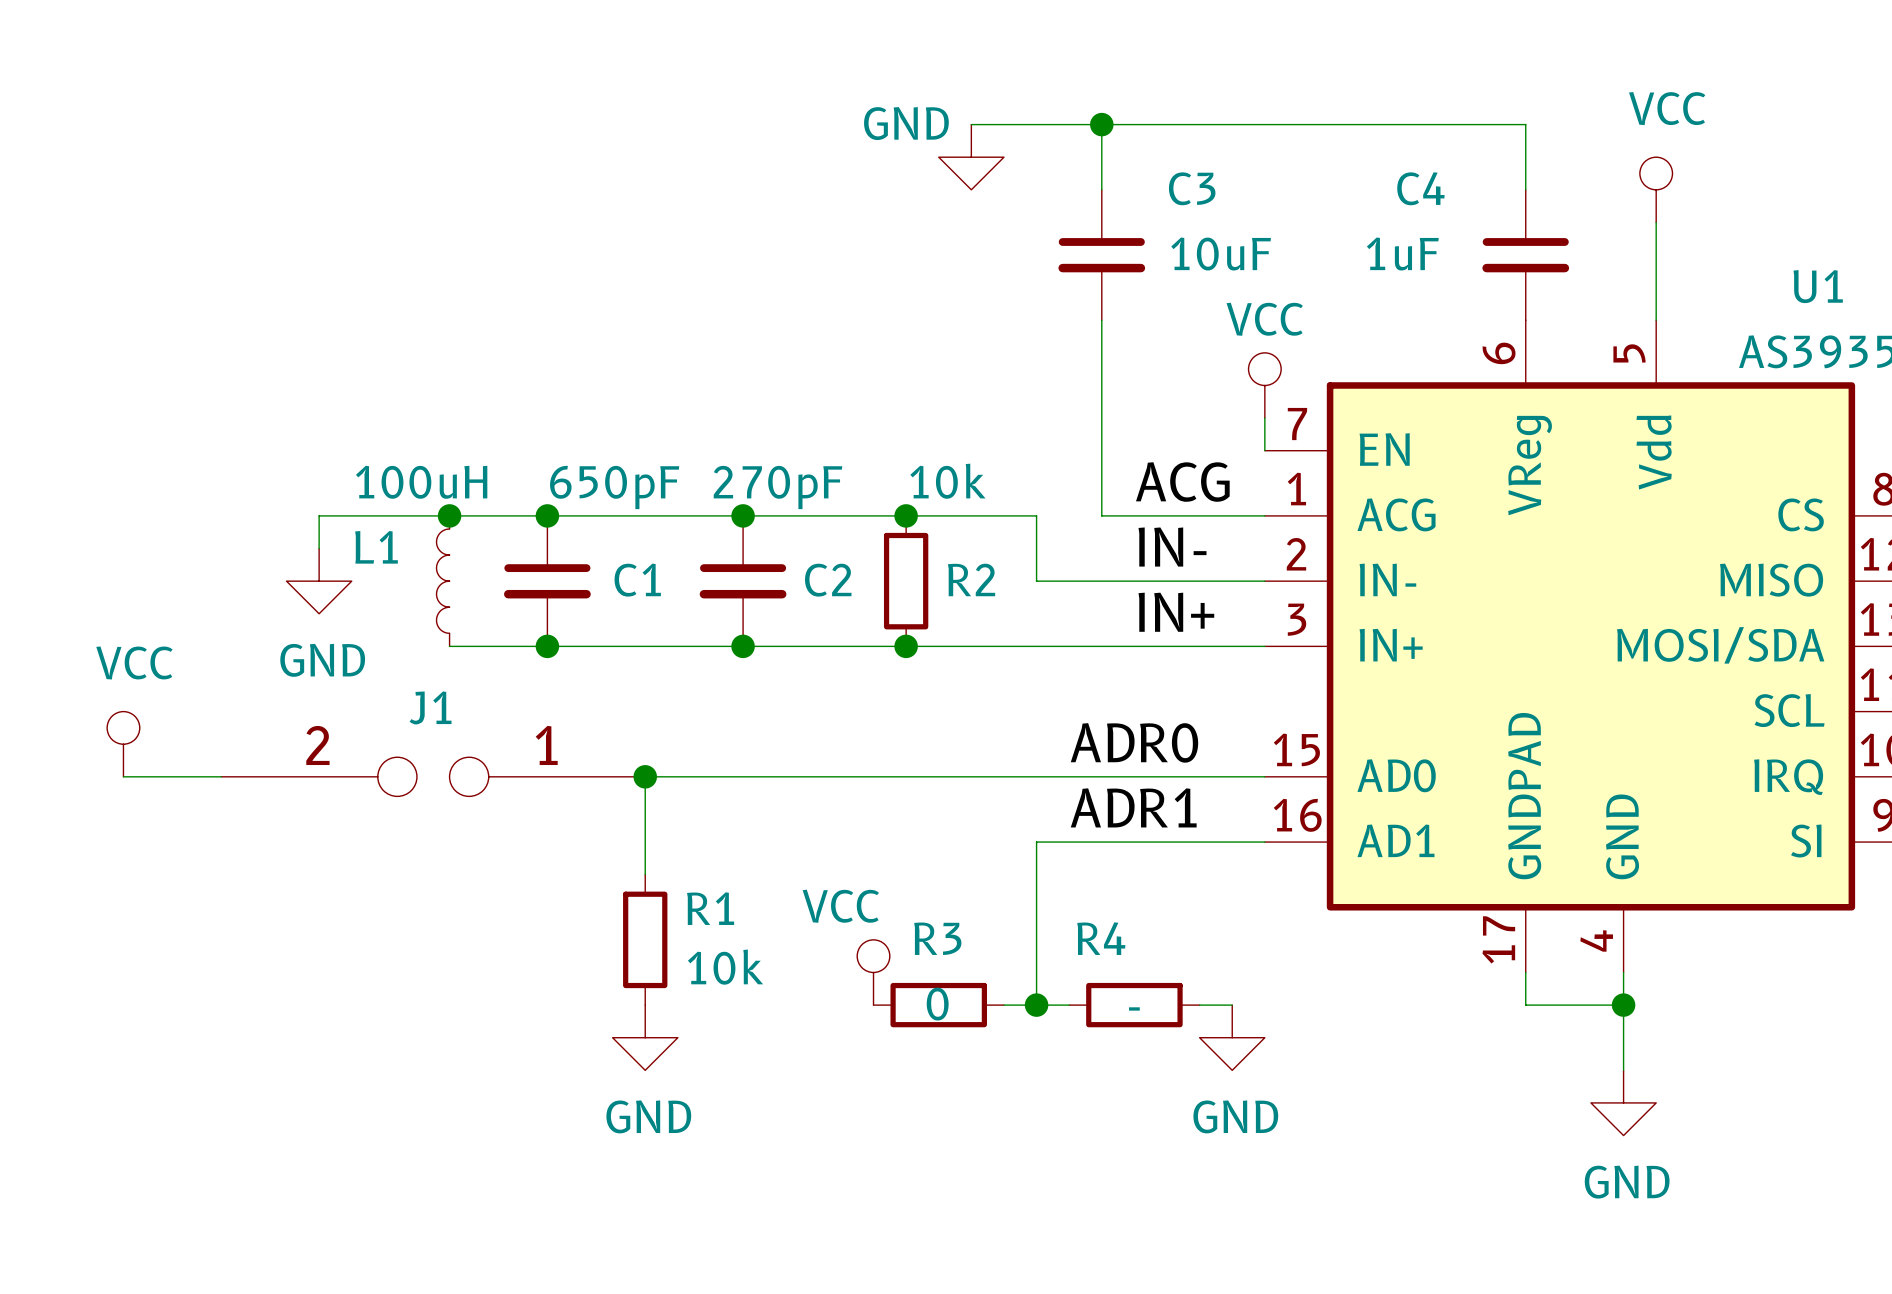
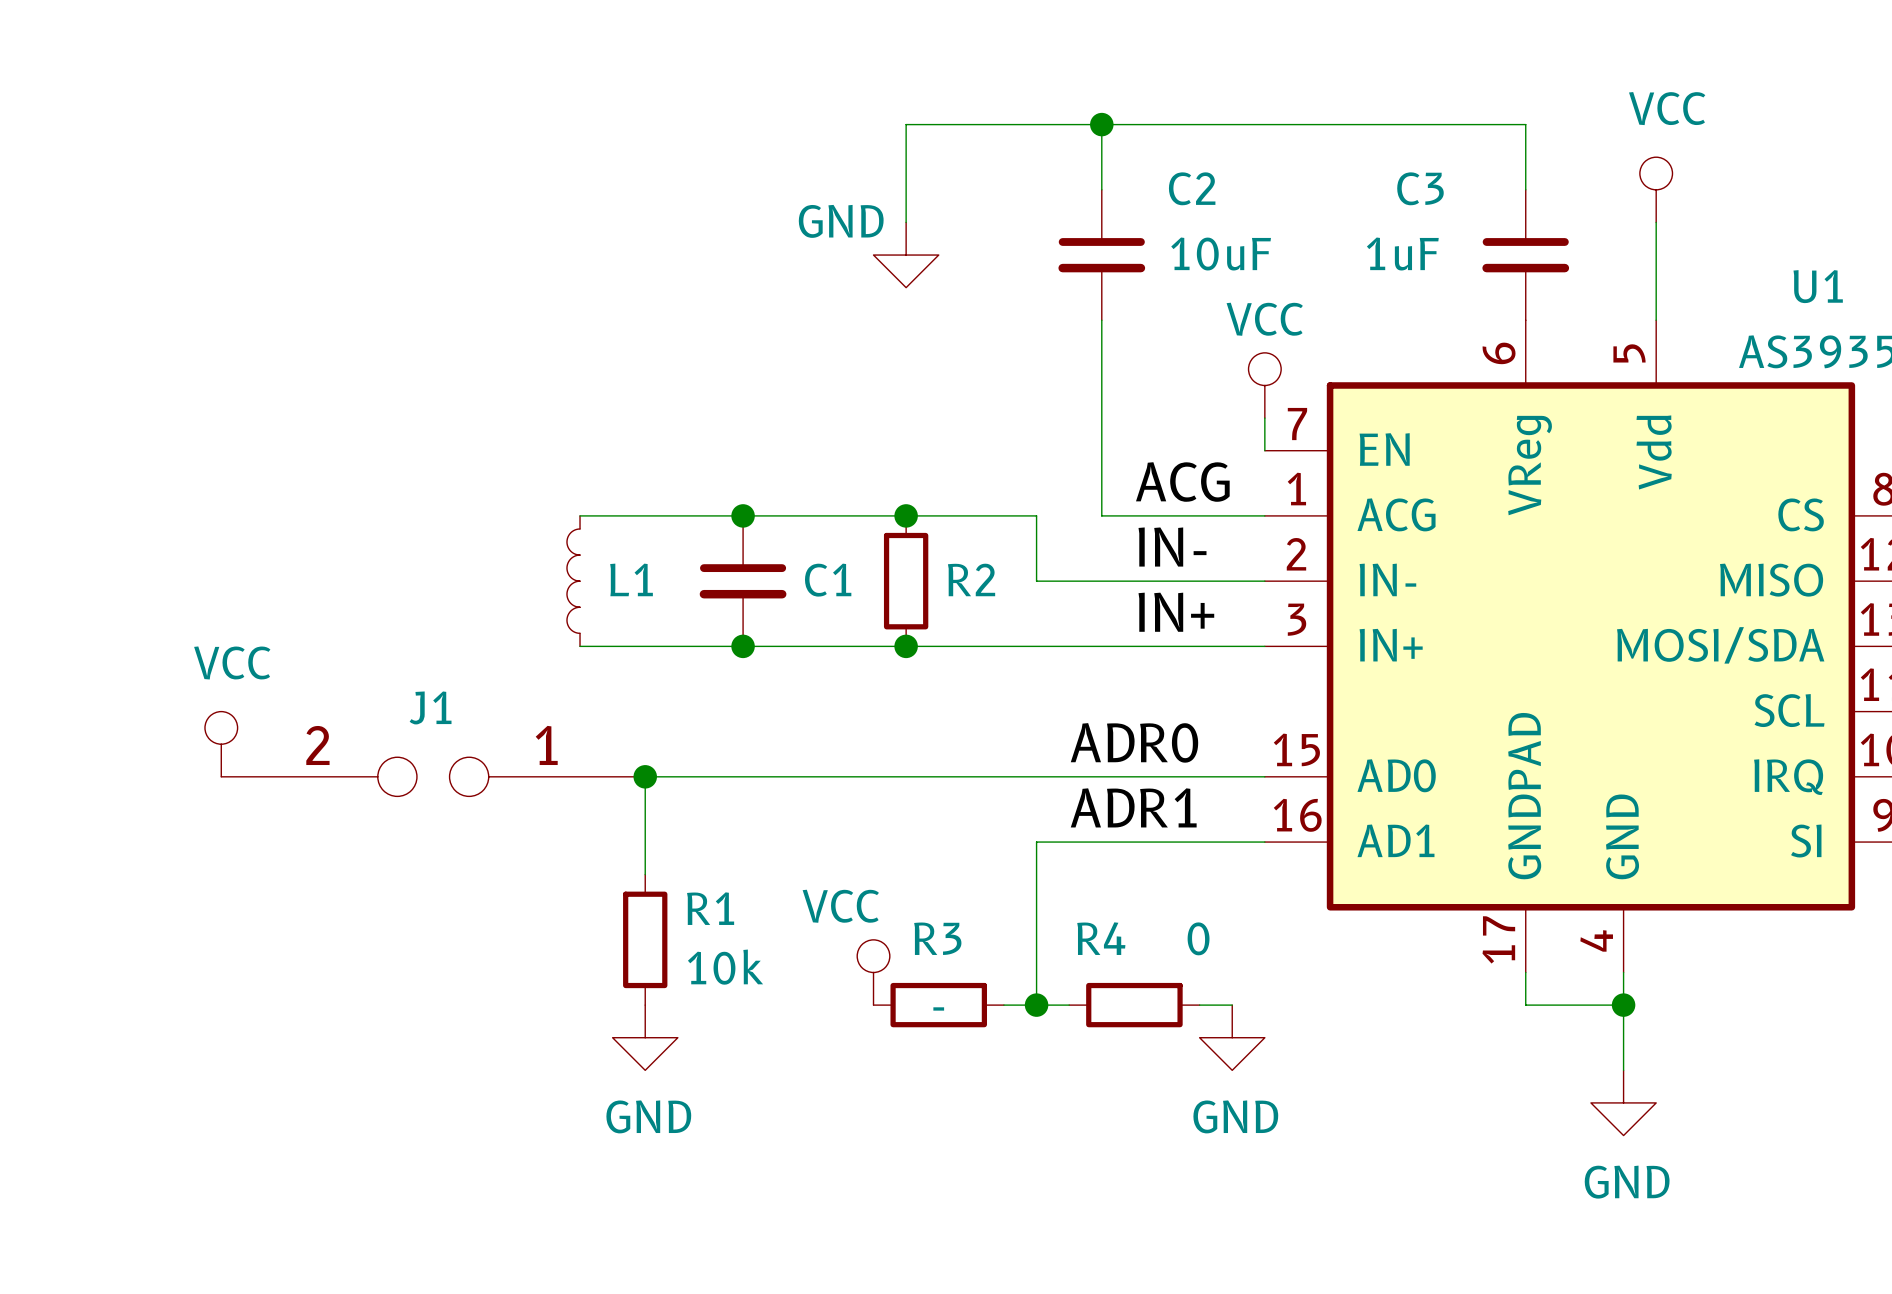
wire: none -> (971, 124) (906, 124) (906, 222)
power symbol position: GND (971, 157) -> GND (906, 255)
C3 name: C3 (1192, 188) -> C2 (1192, 188)
C4 name: C4 (1420, 188) -> C3 (1420, 188)
R2 value: 10k (947, 481) -> none
L1 value: 100uH (421, 482) -> none
C2 value: 270pF (778, 487) -> none
junction: (449, 515) -> none
junction: (547, 515) -> none
wire: (580, 515) (319, 515) (319, 548) -> none
L1 name position: L1 (376, 547) -> L1 (631, 579)
C2 name: C2 (828, 580) -> C1 (828, 580)
power symbol: GND (319, 581) -> none
L1 position: (443, 581) -> (573, 581)
C1: 650pF (547, 581) -> none
wire: (449, 646) (580, 646) -> none
junction: (547, 646) -> none
power symbol position: VCC (123, 744) -> VCC (221, 744)
wire: (123, 776) (221, 776) -> none
R3 value: 0 (937, 1004) -> - (938, 1008)
R4 value: - (1134, 1008) -> 0 (1198, 938)

